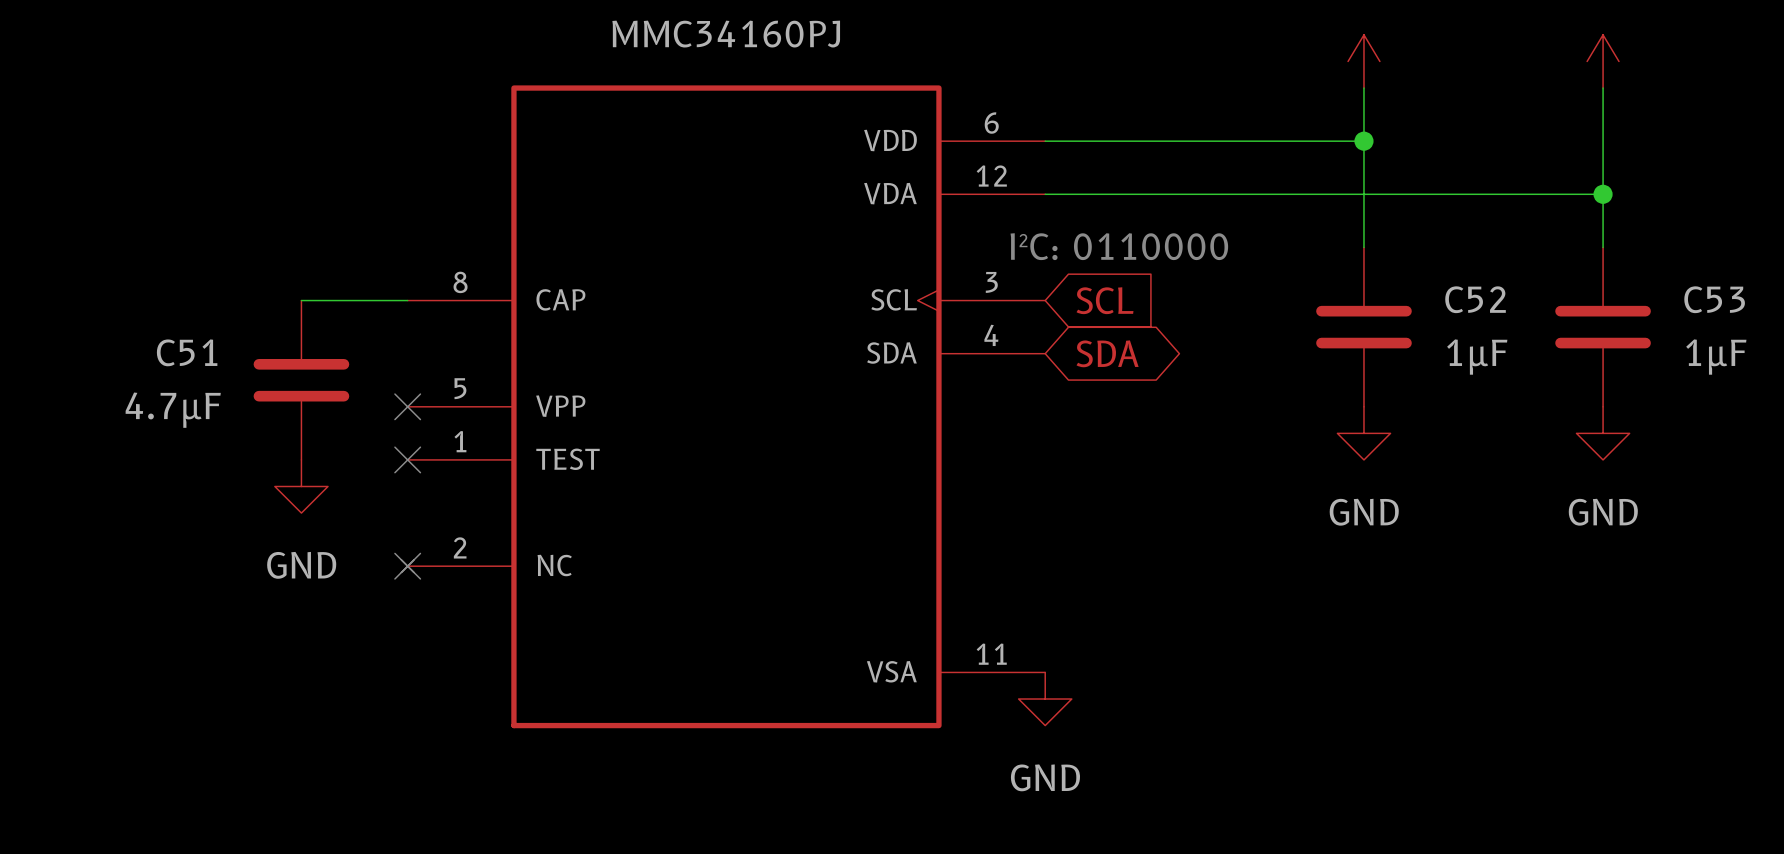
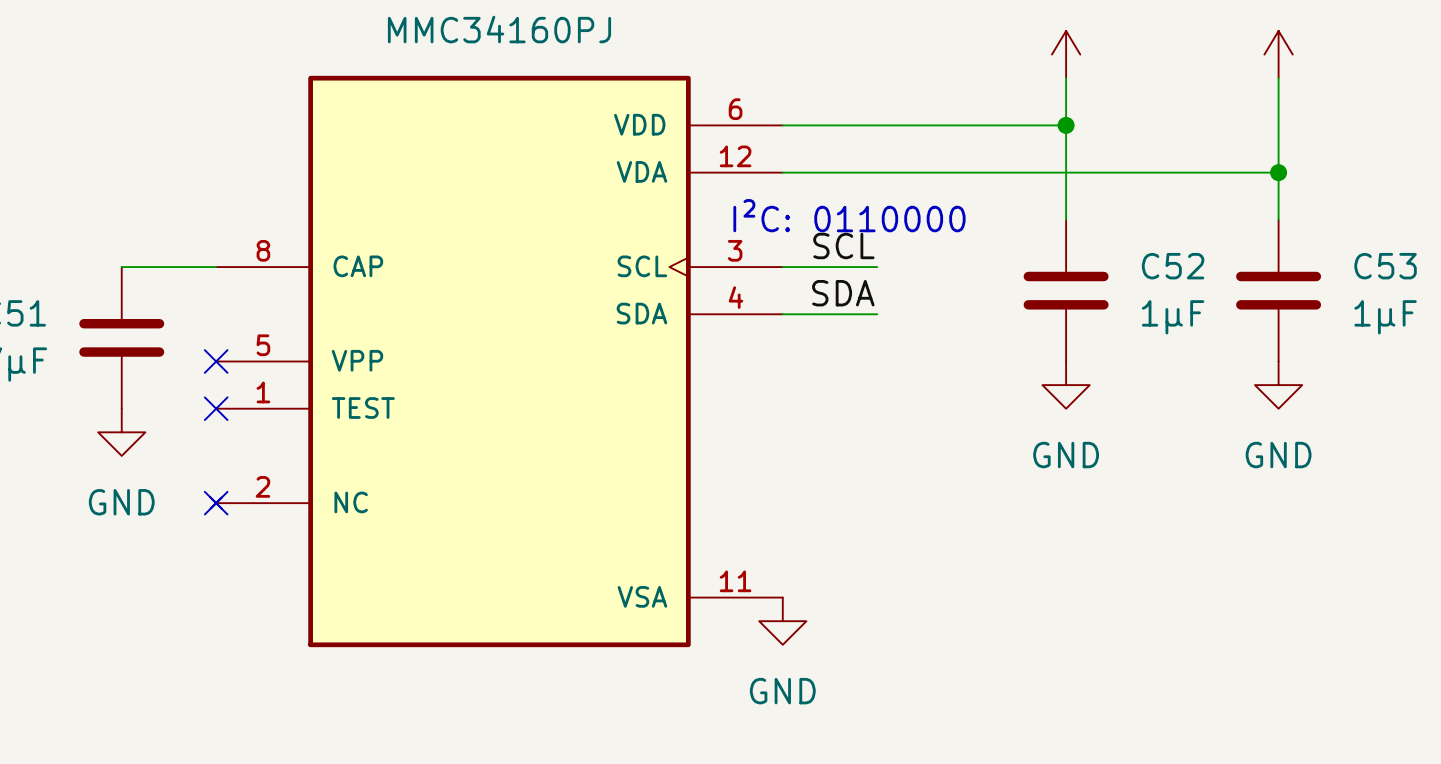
label: none -> SCL (843, 245)
wire: none -> (782, 267) (877, 267)
global label: SCL (1105, 300) -> none
label: none -> SDA (843, 293)
wire: none -> (782, 314) (877, 314)
global label: SDA (1107, 353) -> none

